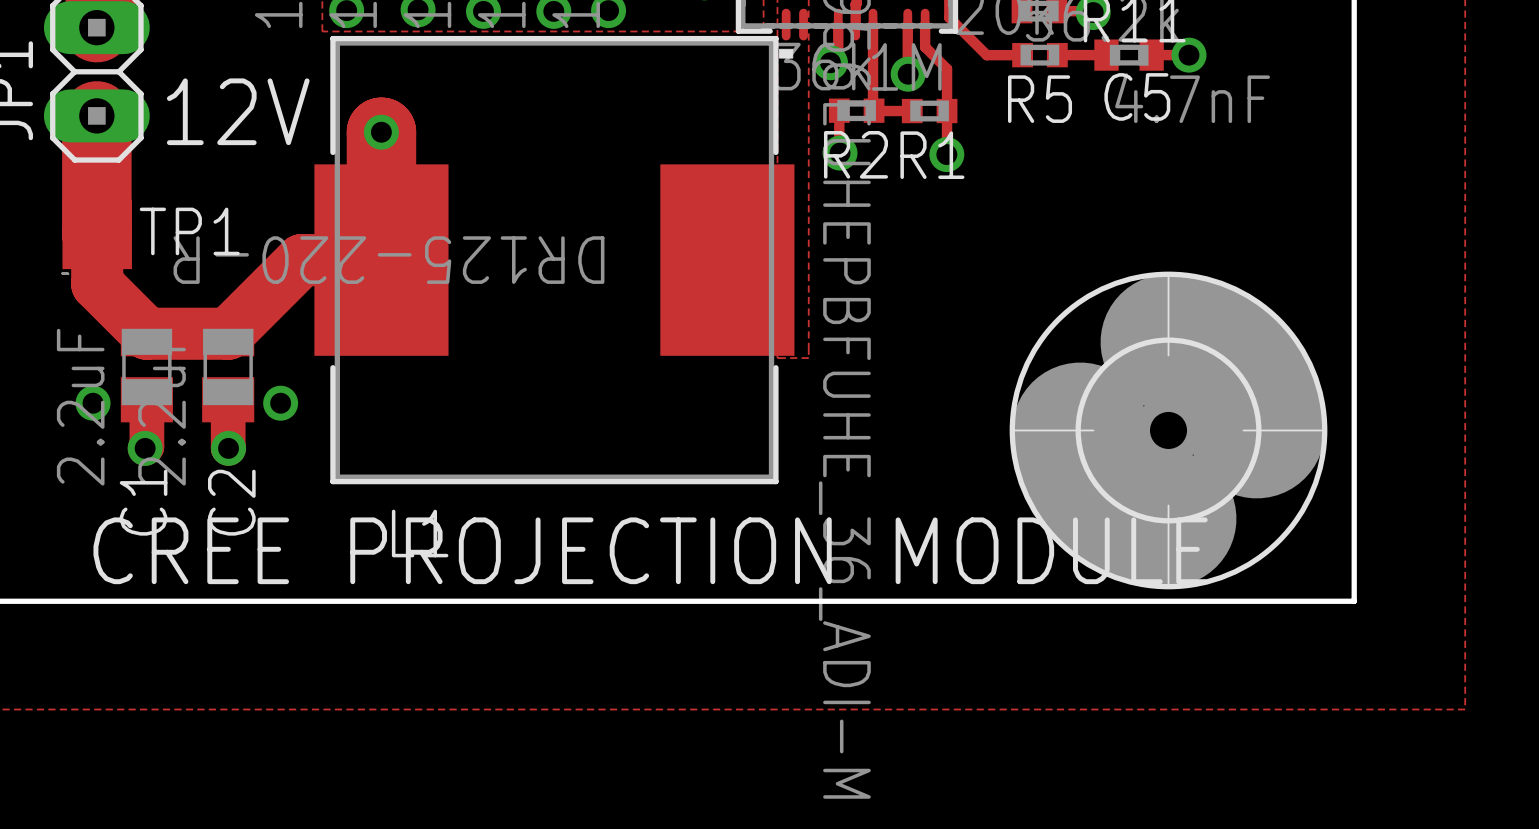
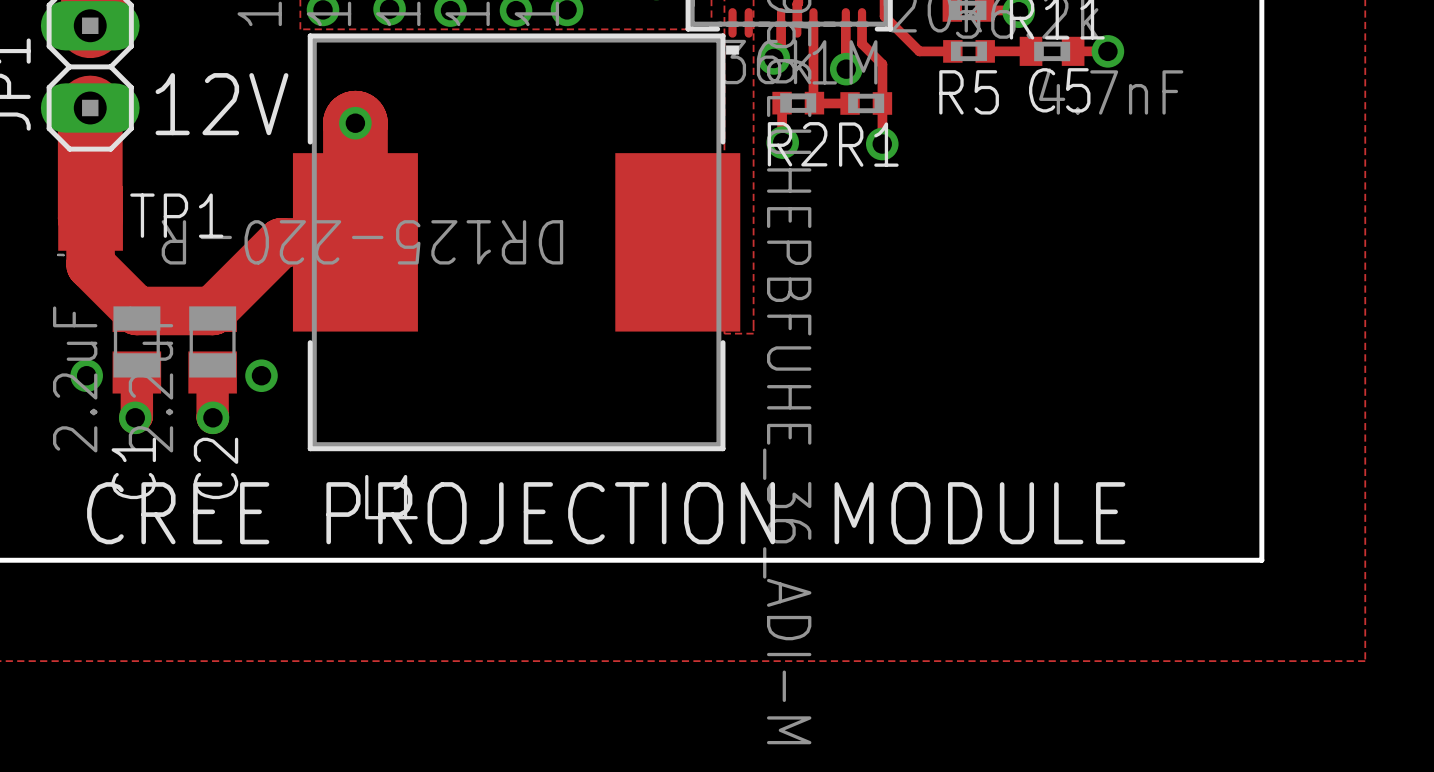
part: (1168, 430) -> none

